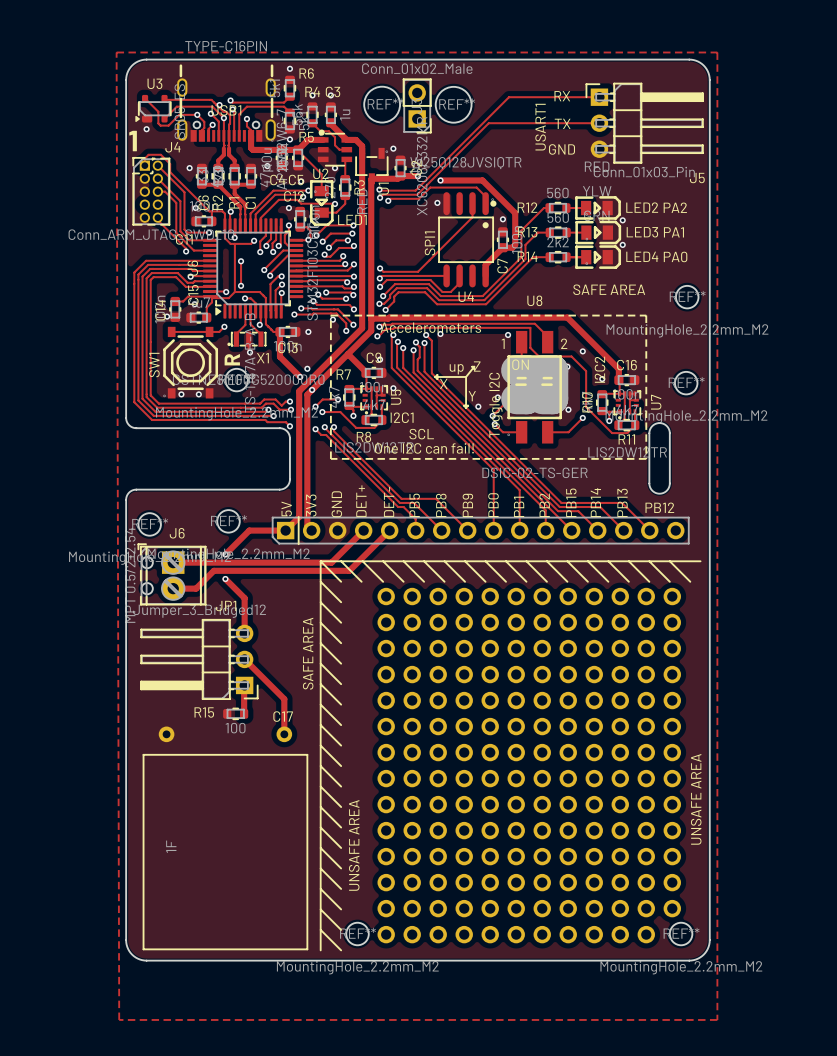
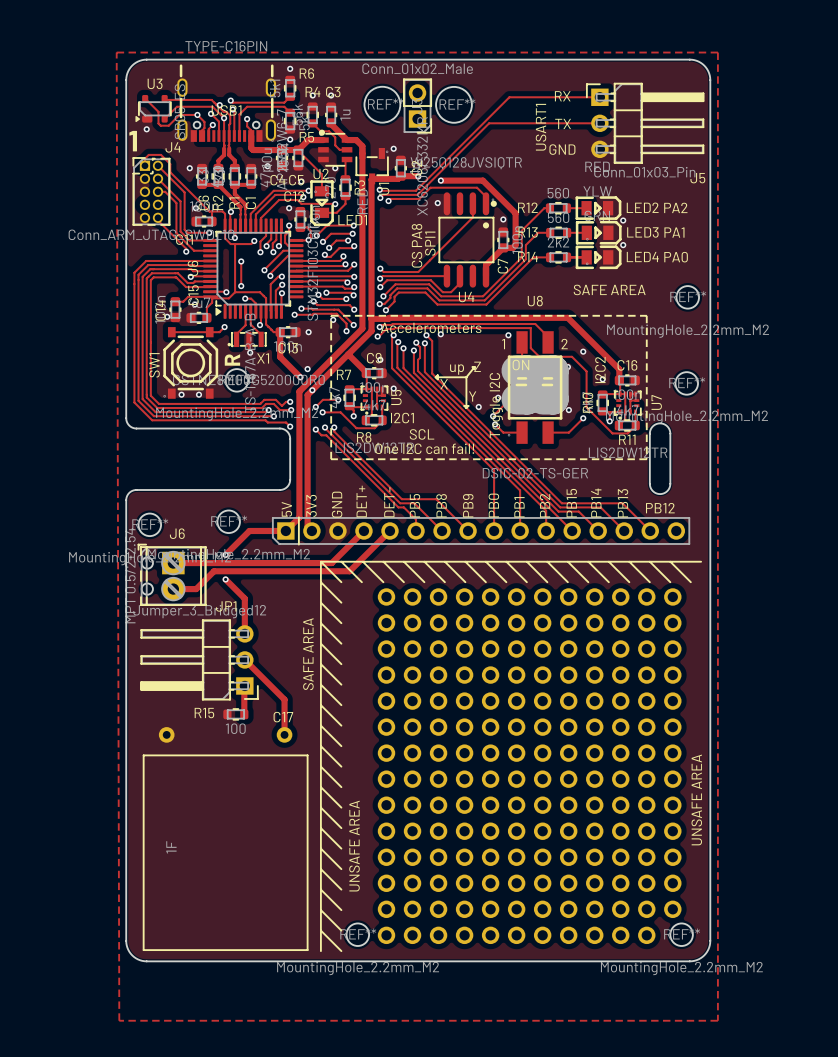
text: none -> CS PA8 (417, 245)

